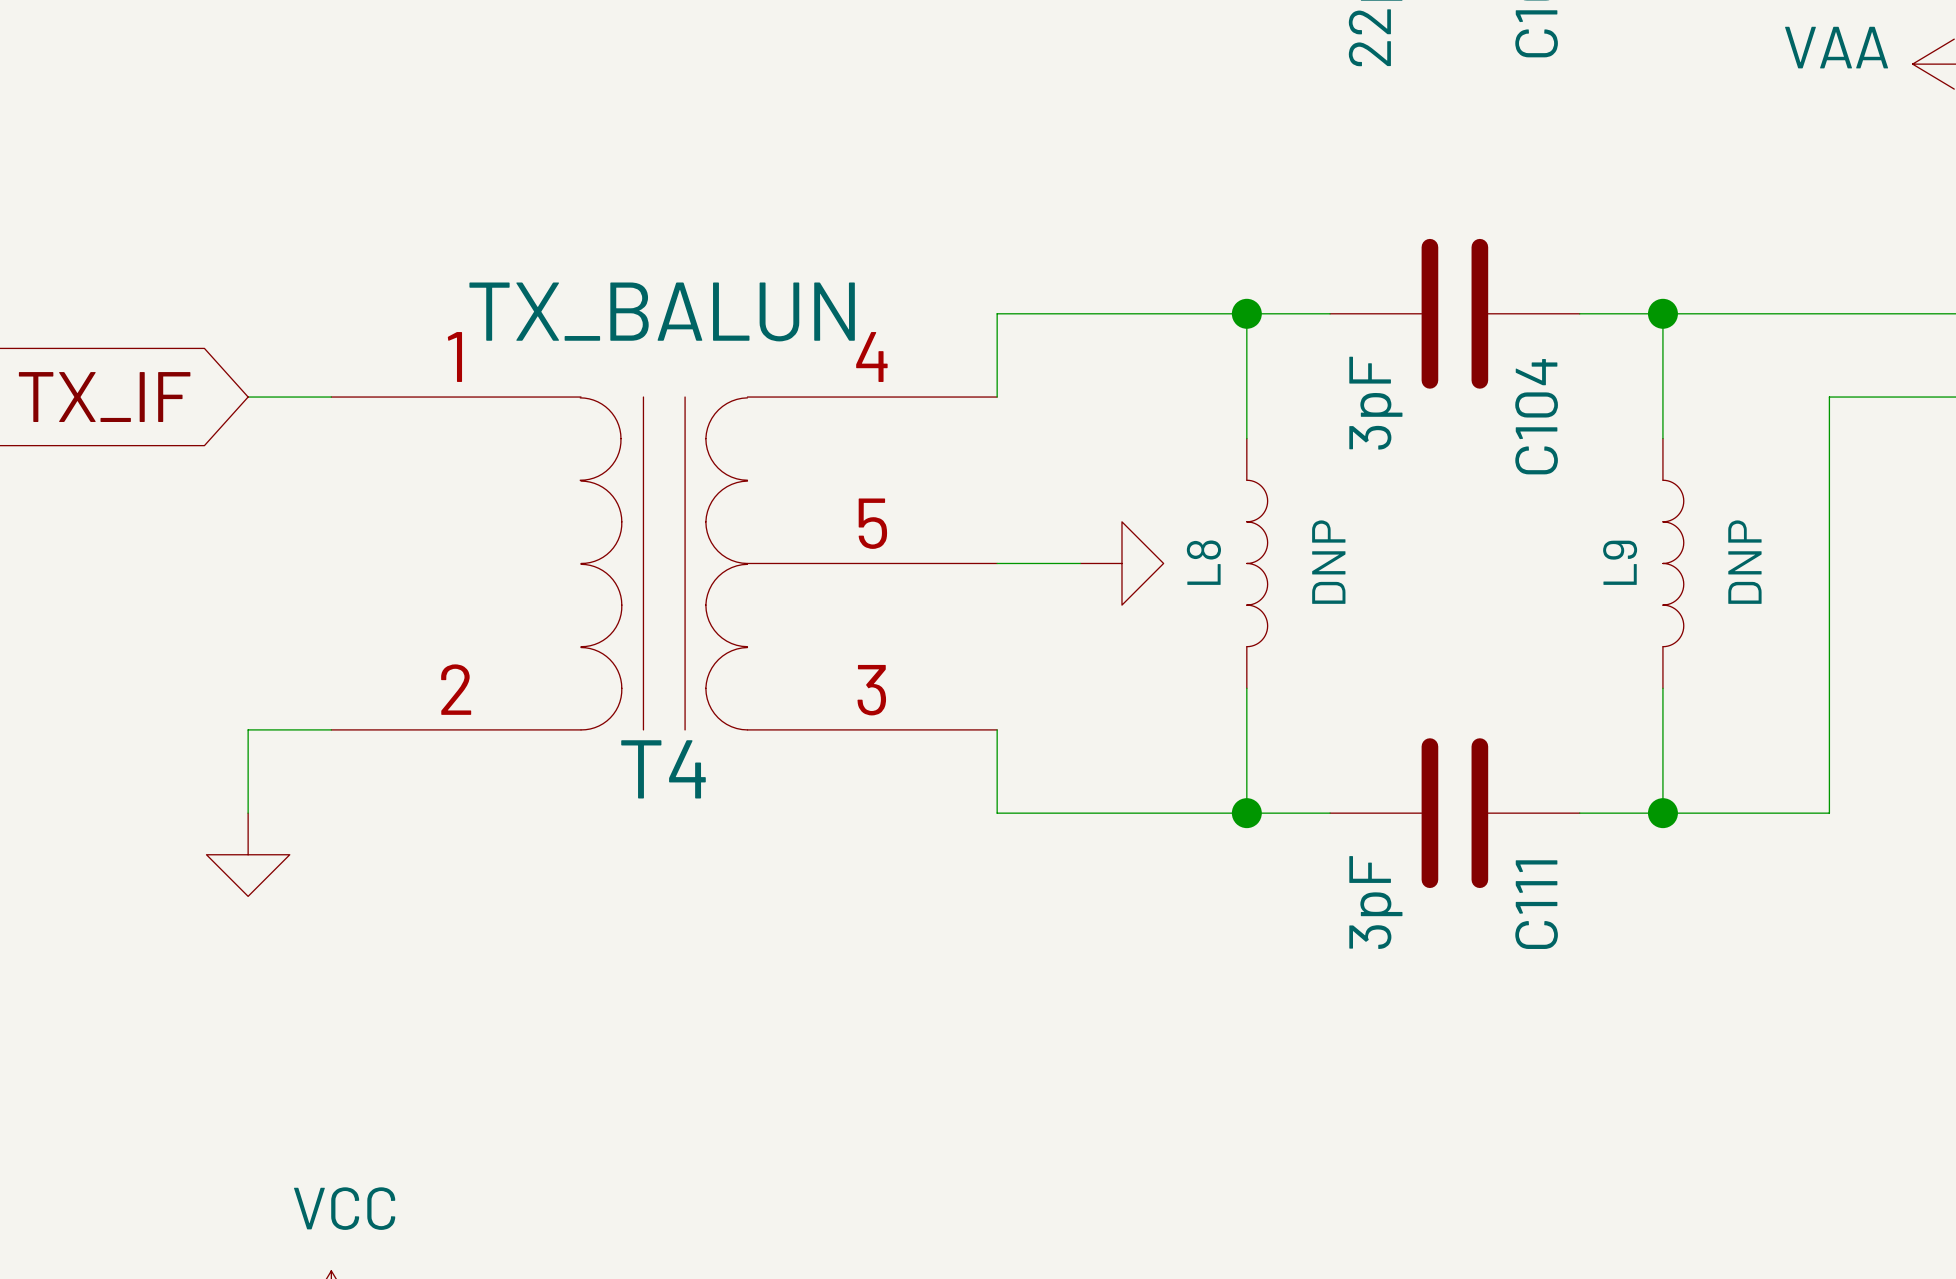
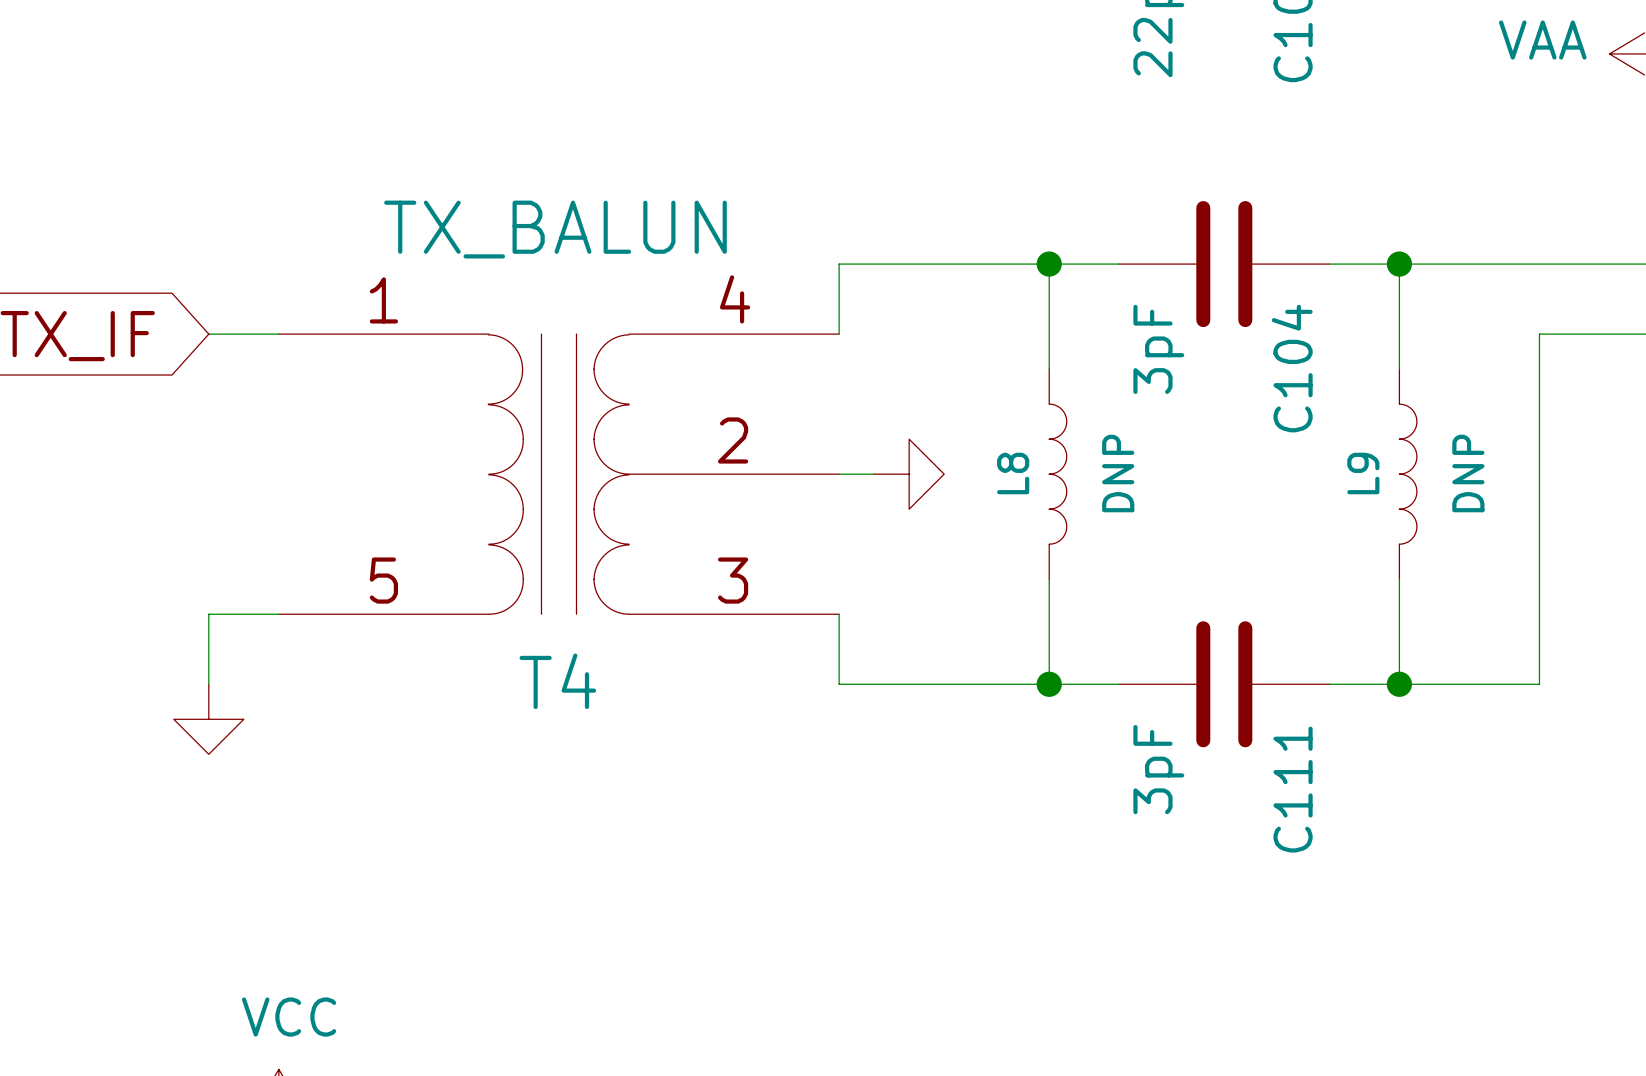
T4 value position: TX_BALUN (662, 311) -> TX_BALUN (555, 229)
T4 pin number: 5 (872, 523) -> 2 (733, 440)
power symbol position: (1121, 563) -> (909, 474)
T4 pin number: 2 (456, 689) -> 5 (383, 580)
T4 name position: T4 (663, 769) -> T4 (557, 681)

